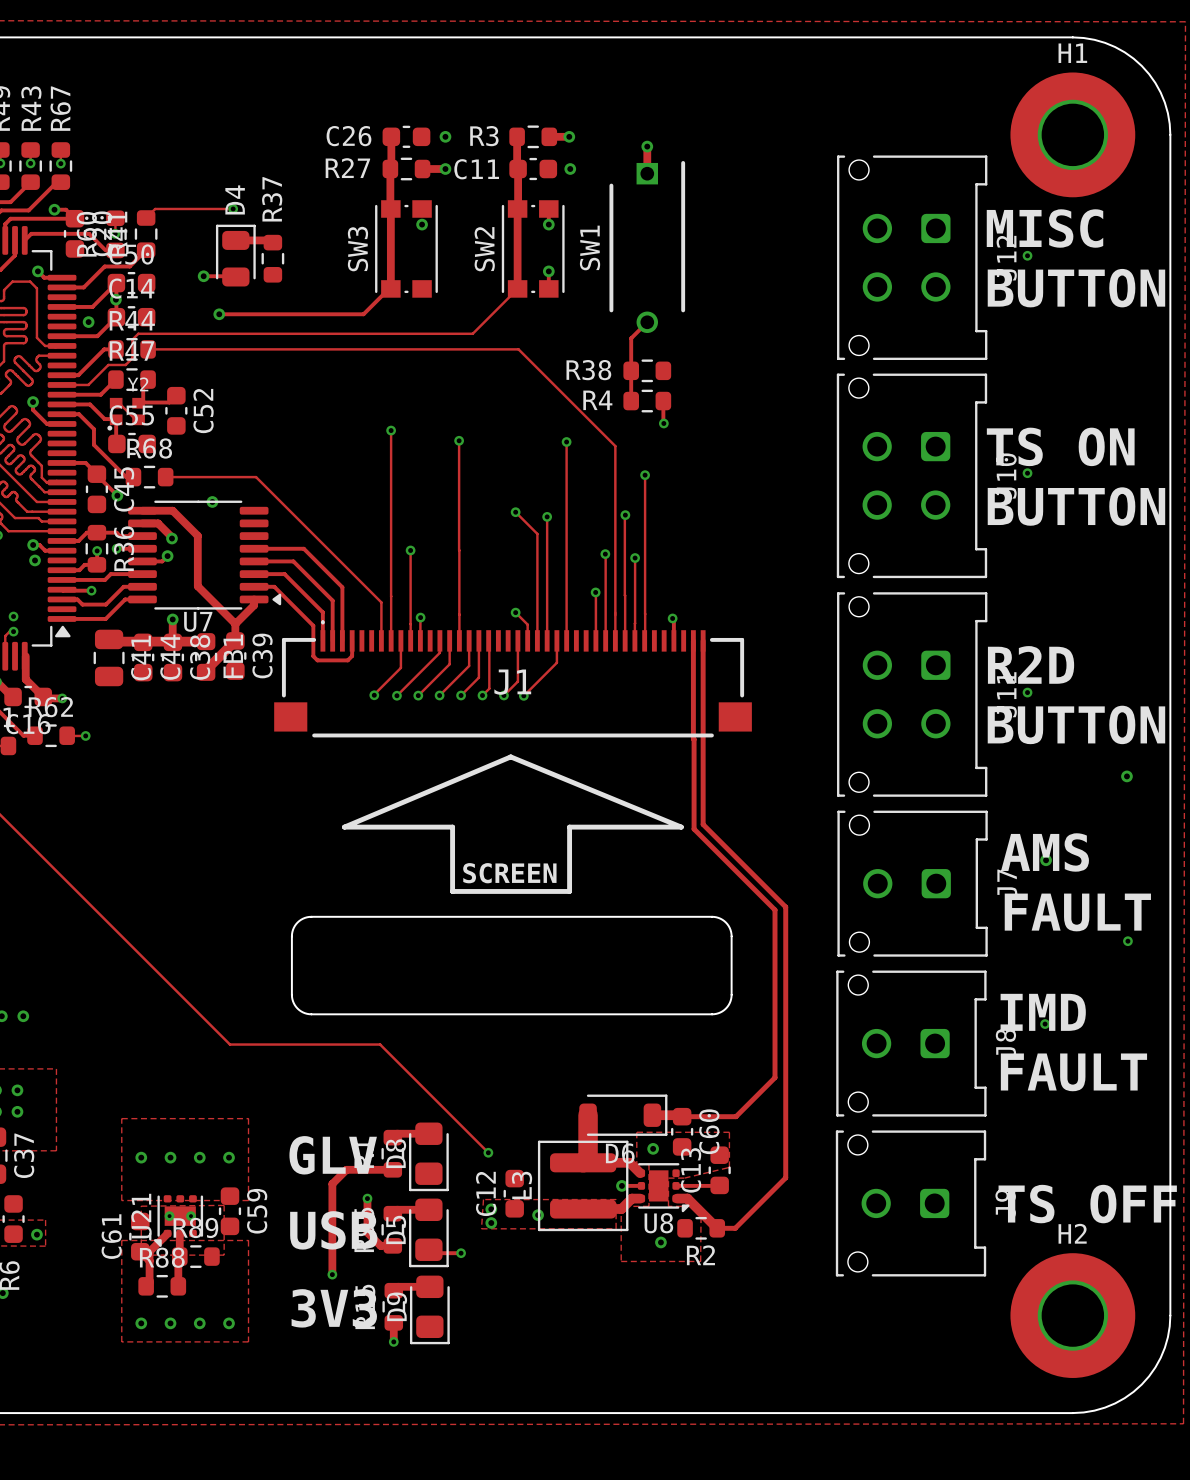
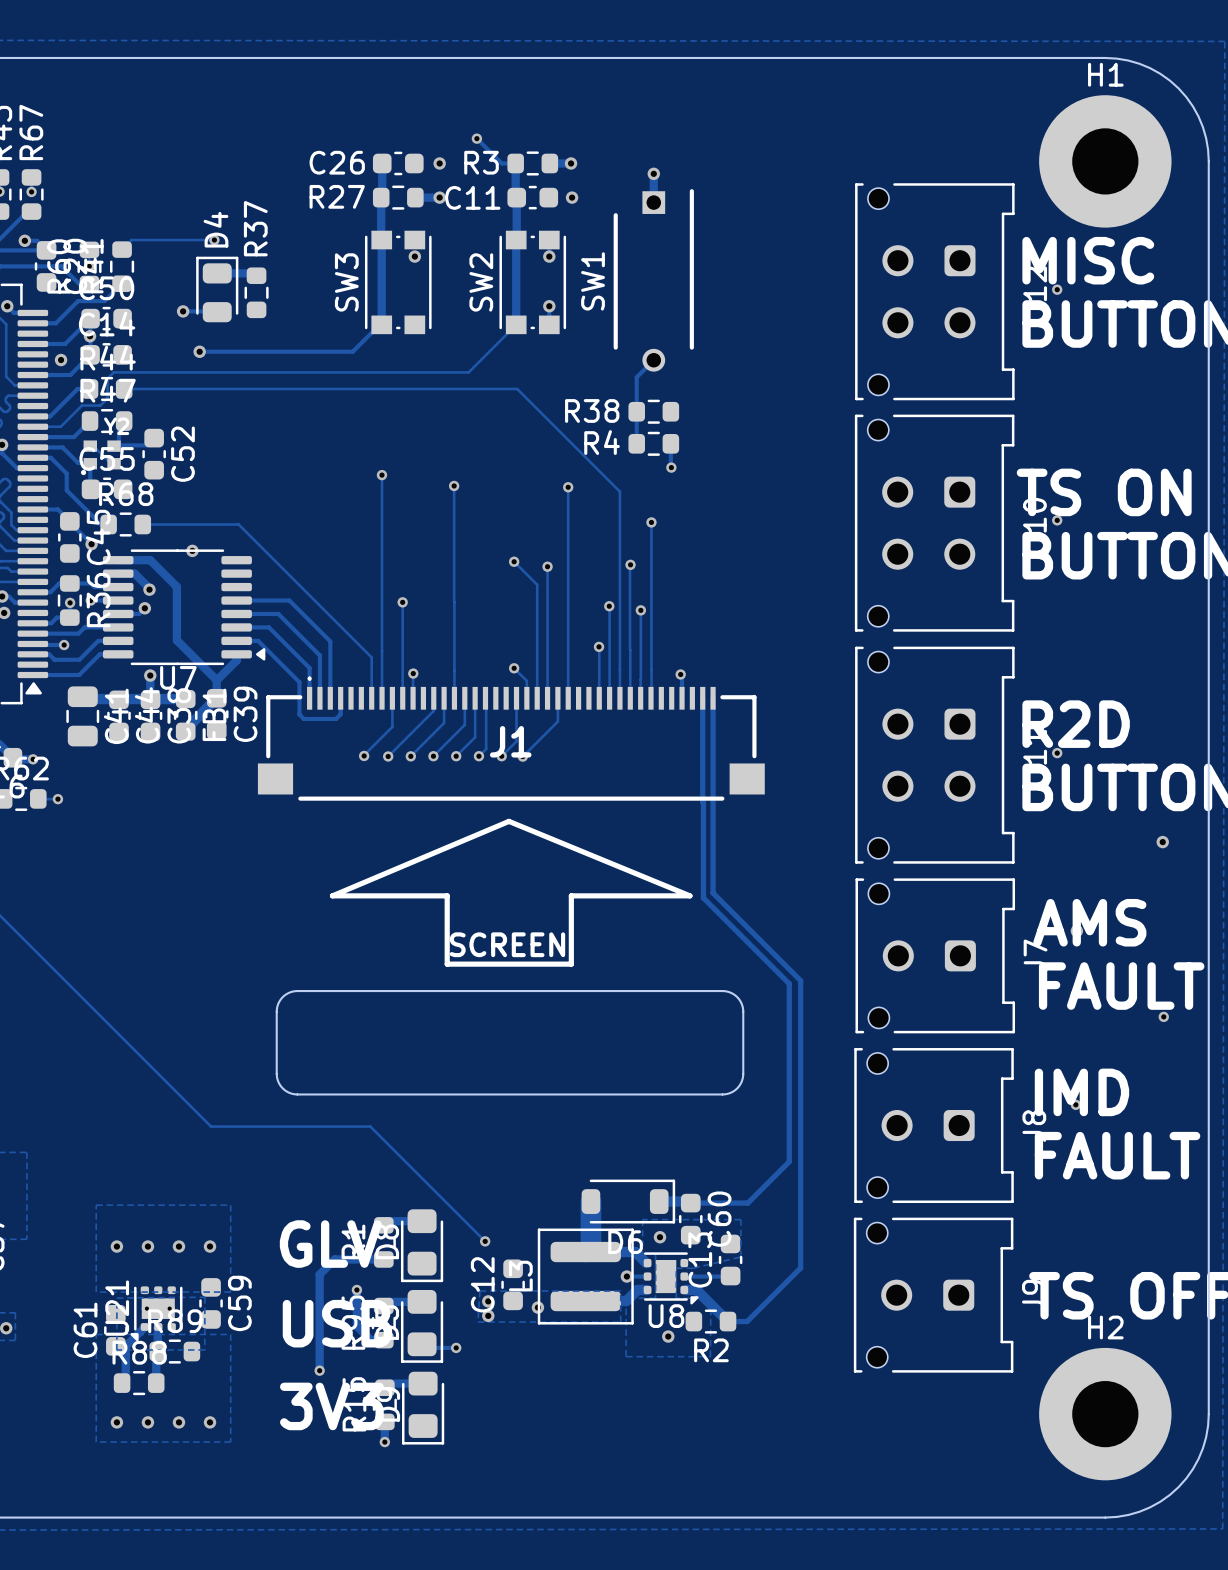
track: none -> (476, 138) (501, 163) (515, 163)
via: none -> (476, 138)

